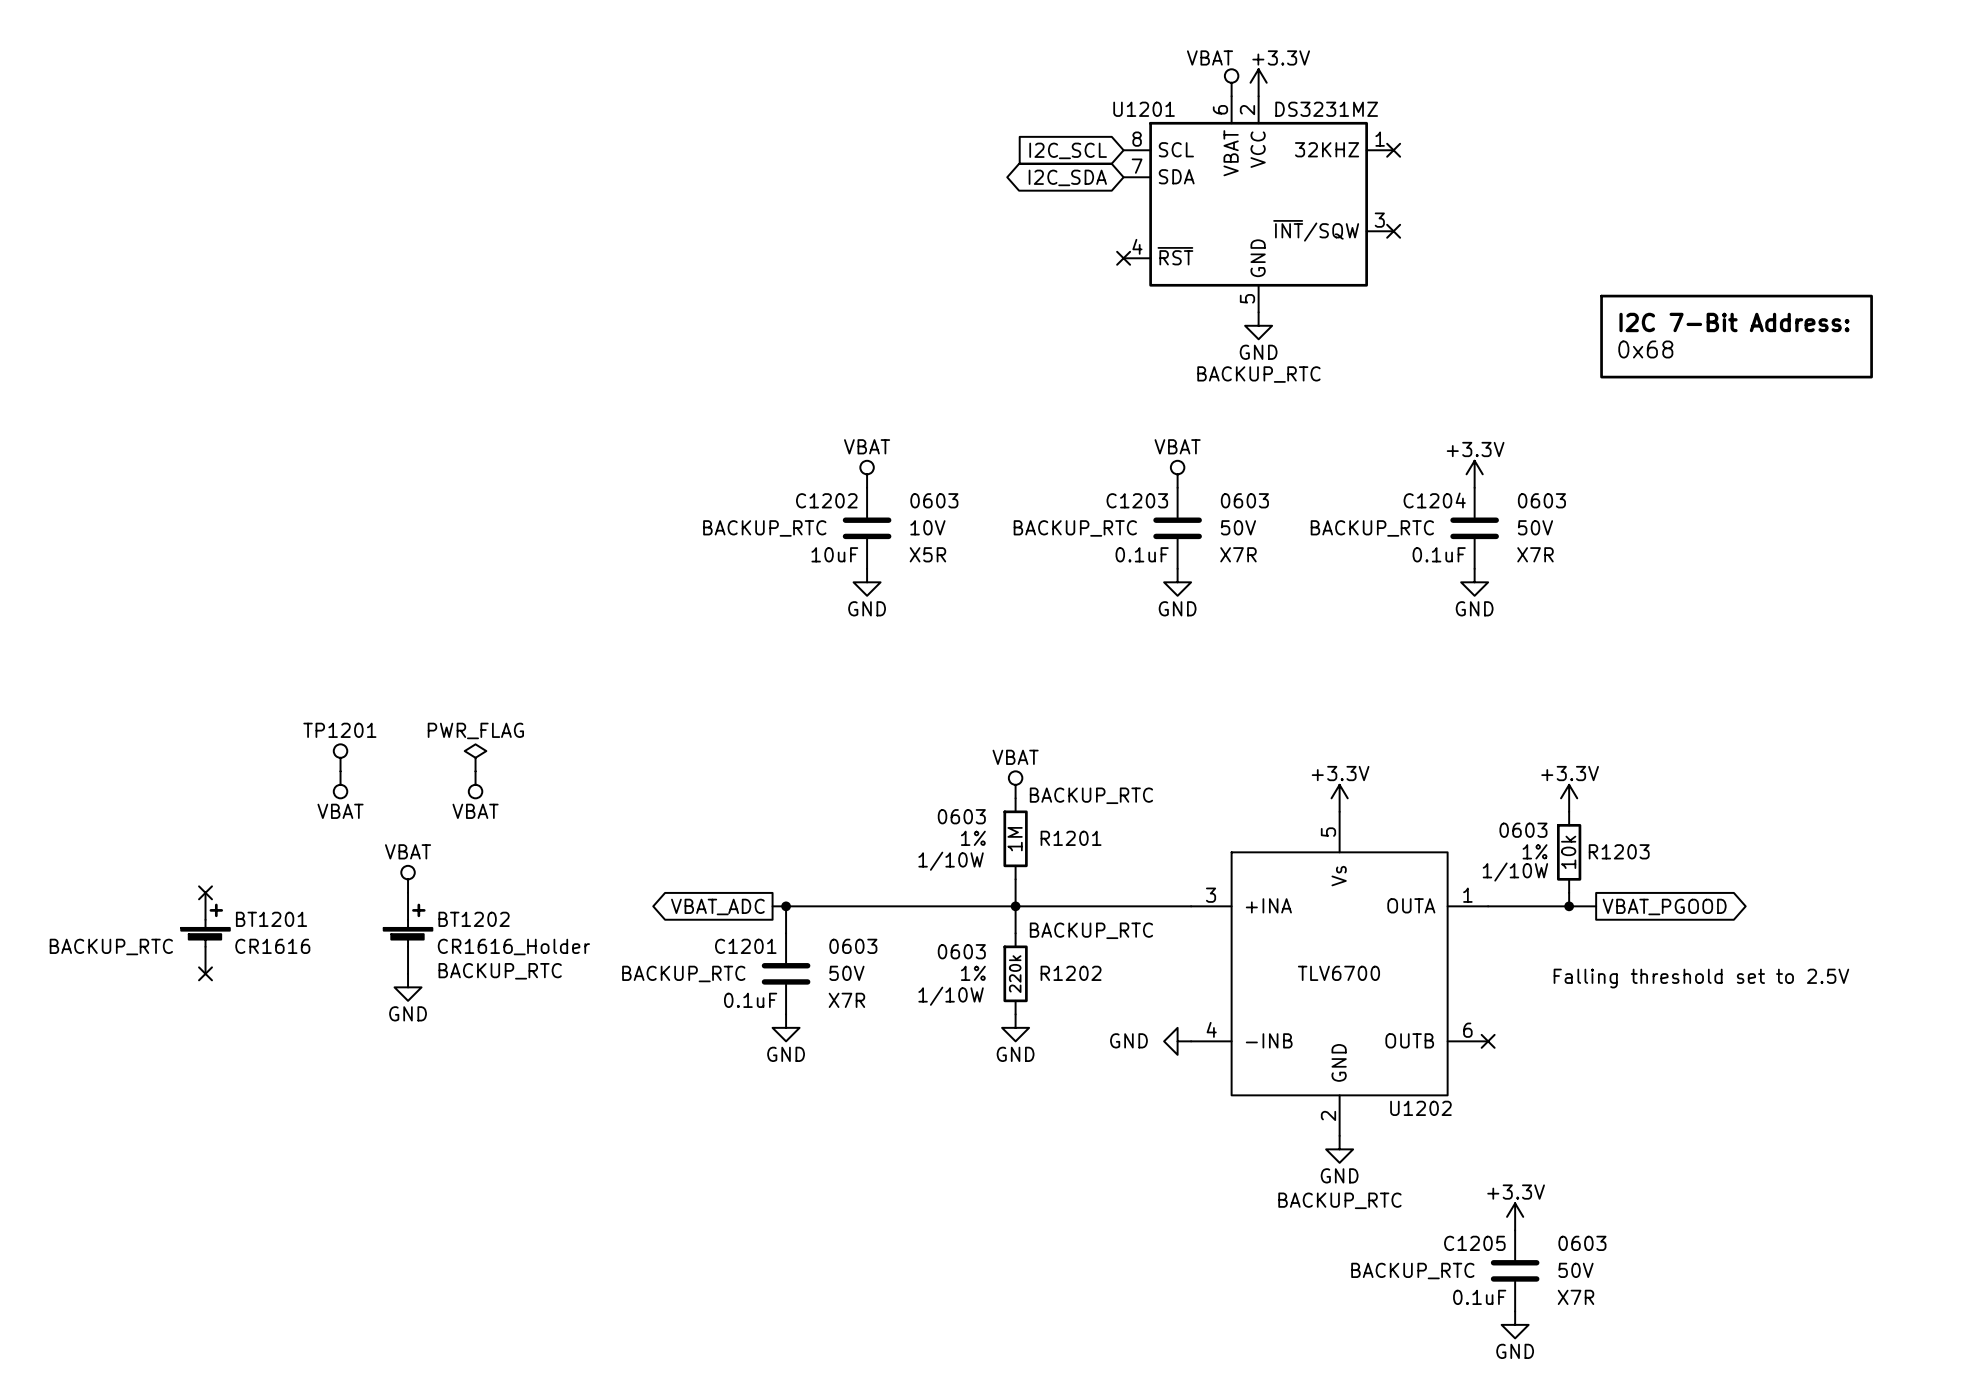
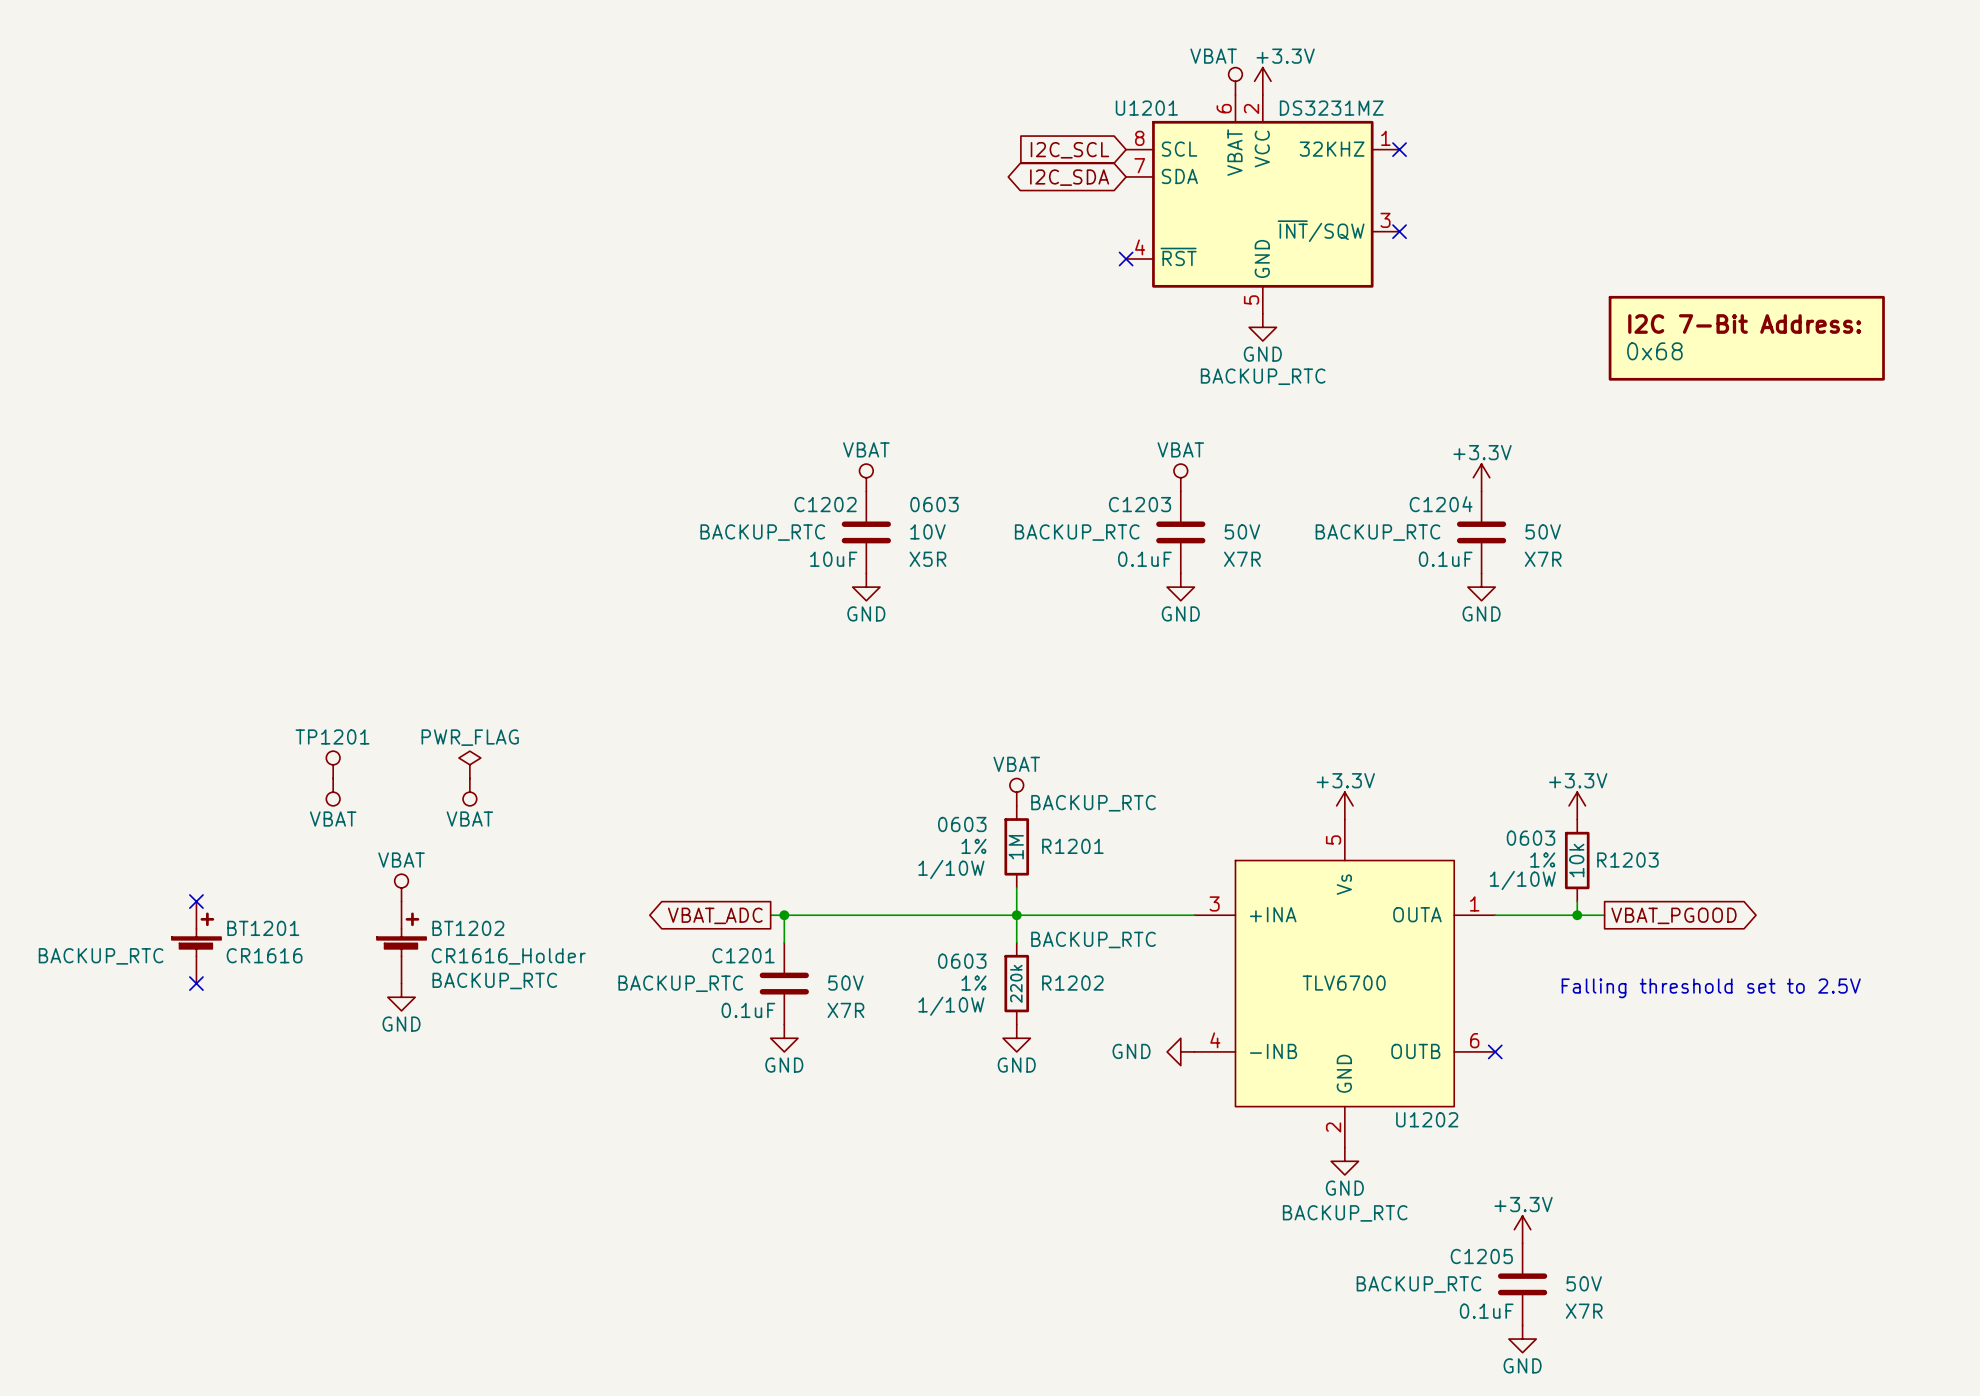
C1203 text: 0603 (1244, 500) -> none
C1204 text: 0603 (1541, 500) -> none
C1201 text: 0603 (853, 946) -> none
C1205 text: 0603 (1582, 1243) -> none

